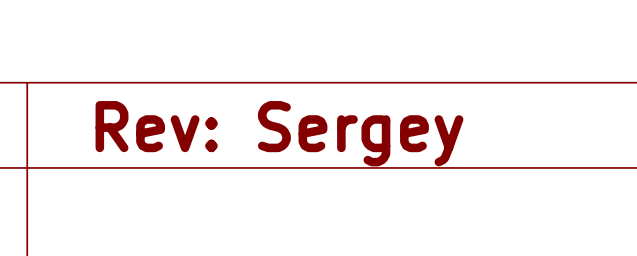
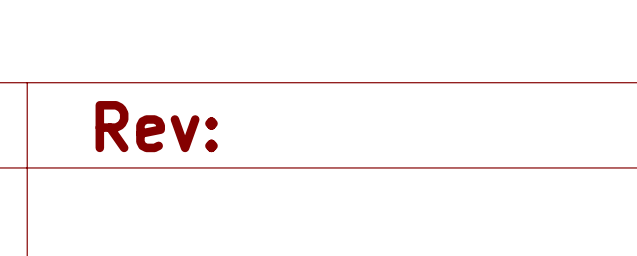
title block: Rev: Sergey (279, 133) -> Rev: (156, 126)

